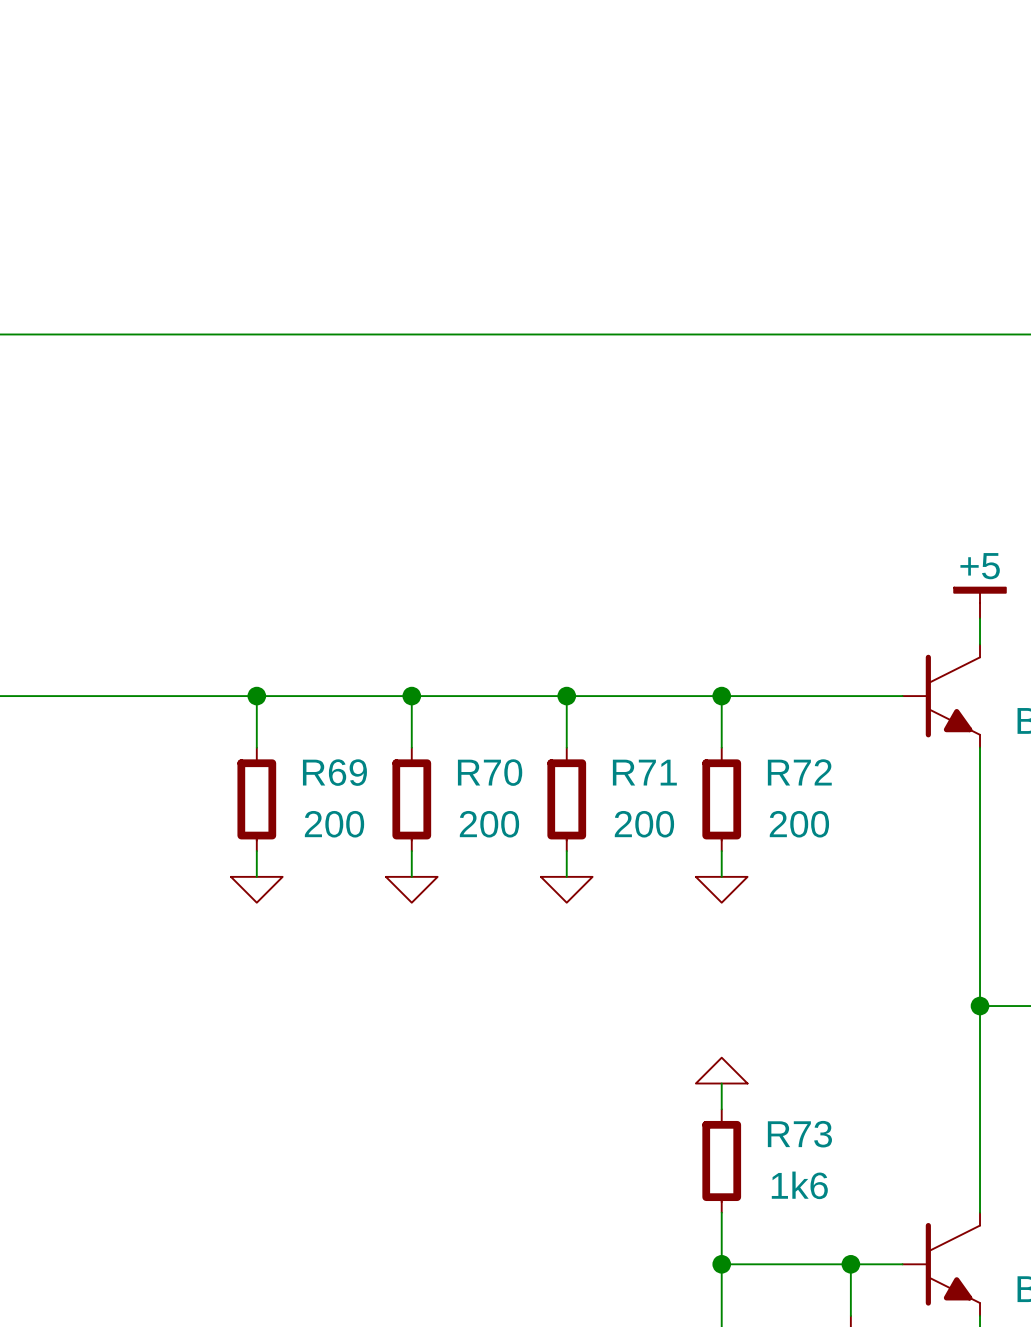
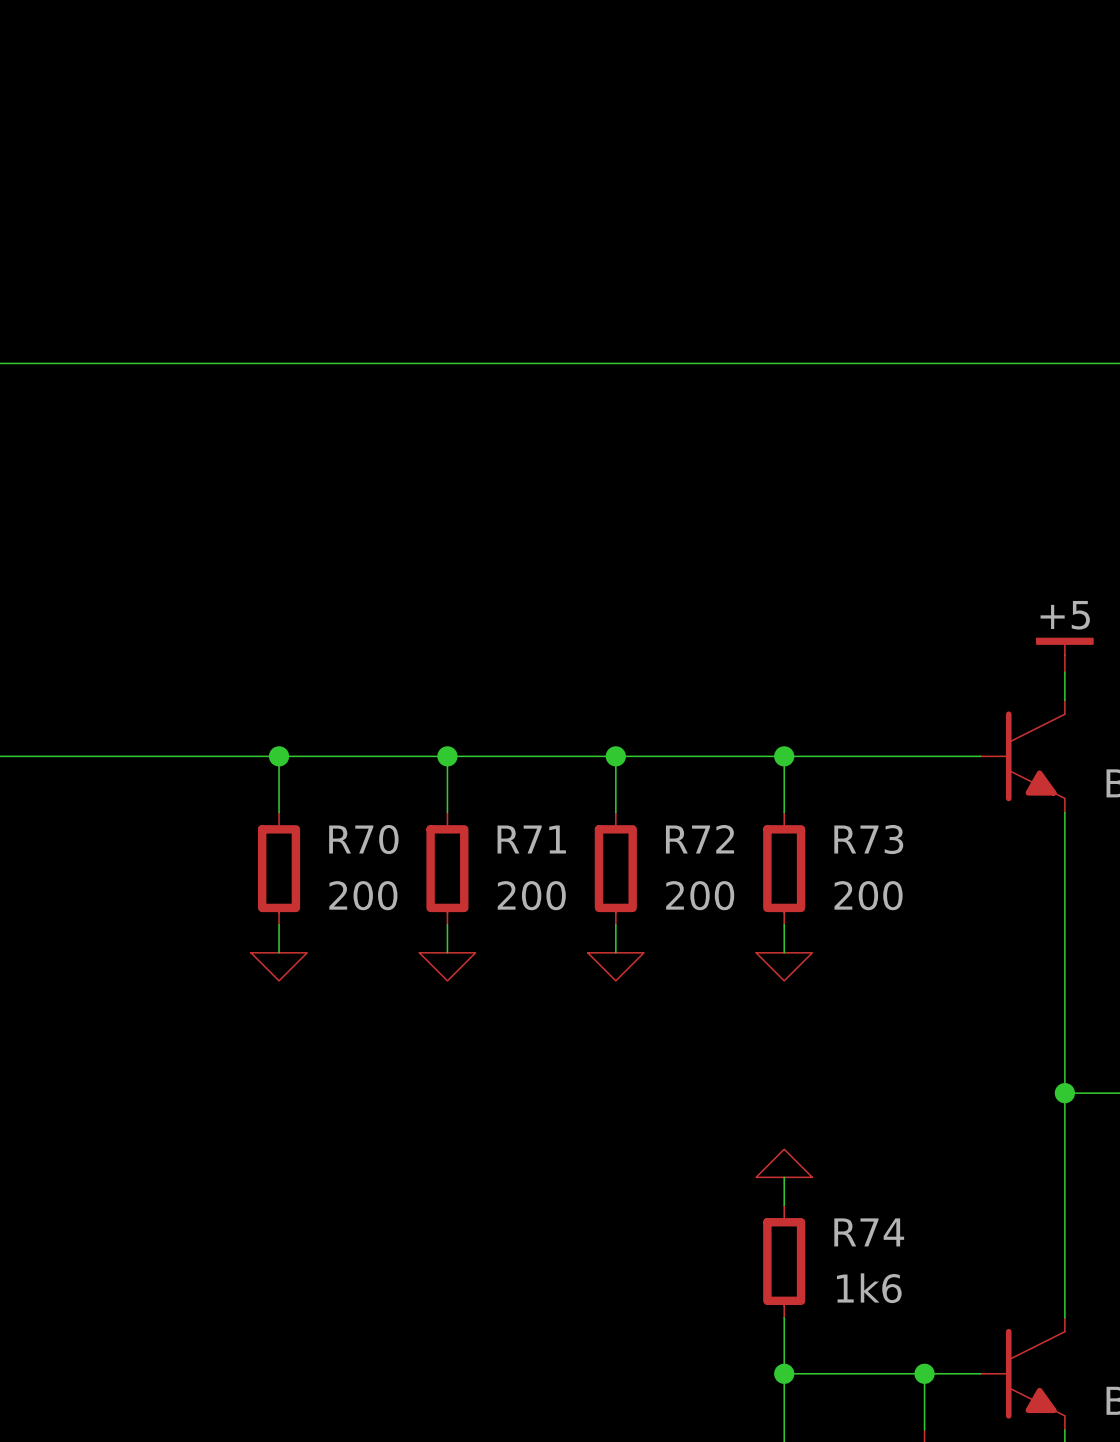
R69 name: R69 (334, 772) -> R70 (363, 839)
R70 name: R70 (490, 772) -> R71 (531, 839)
R71 name: R71 (644, 772) -> R72 (699, 839)
R72 name: R72 (799, 772) -> R73 (868, 839)
R73 name: R73 (799, 1134) -> R74 (869, 1232)

